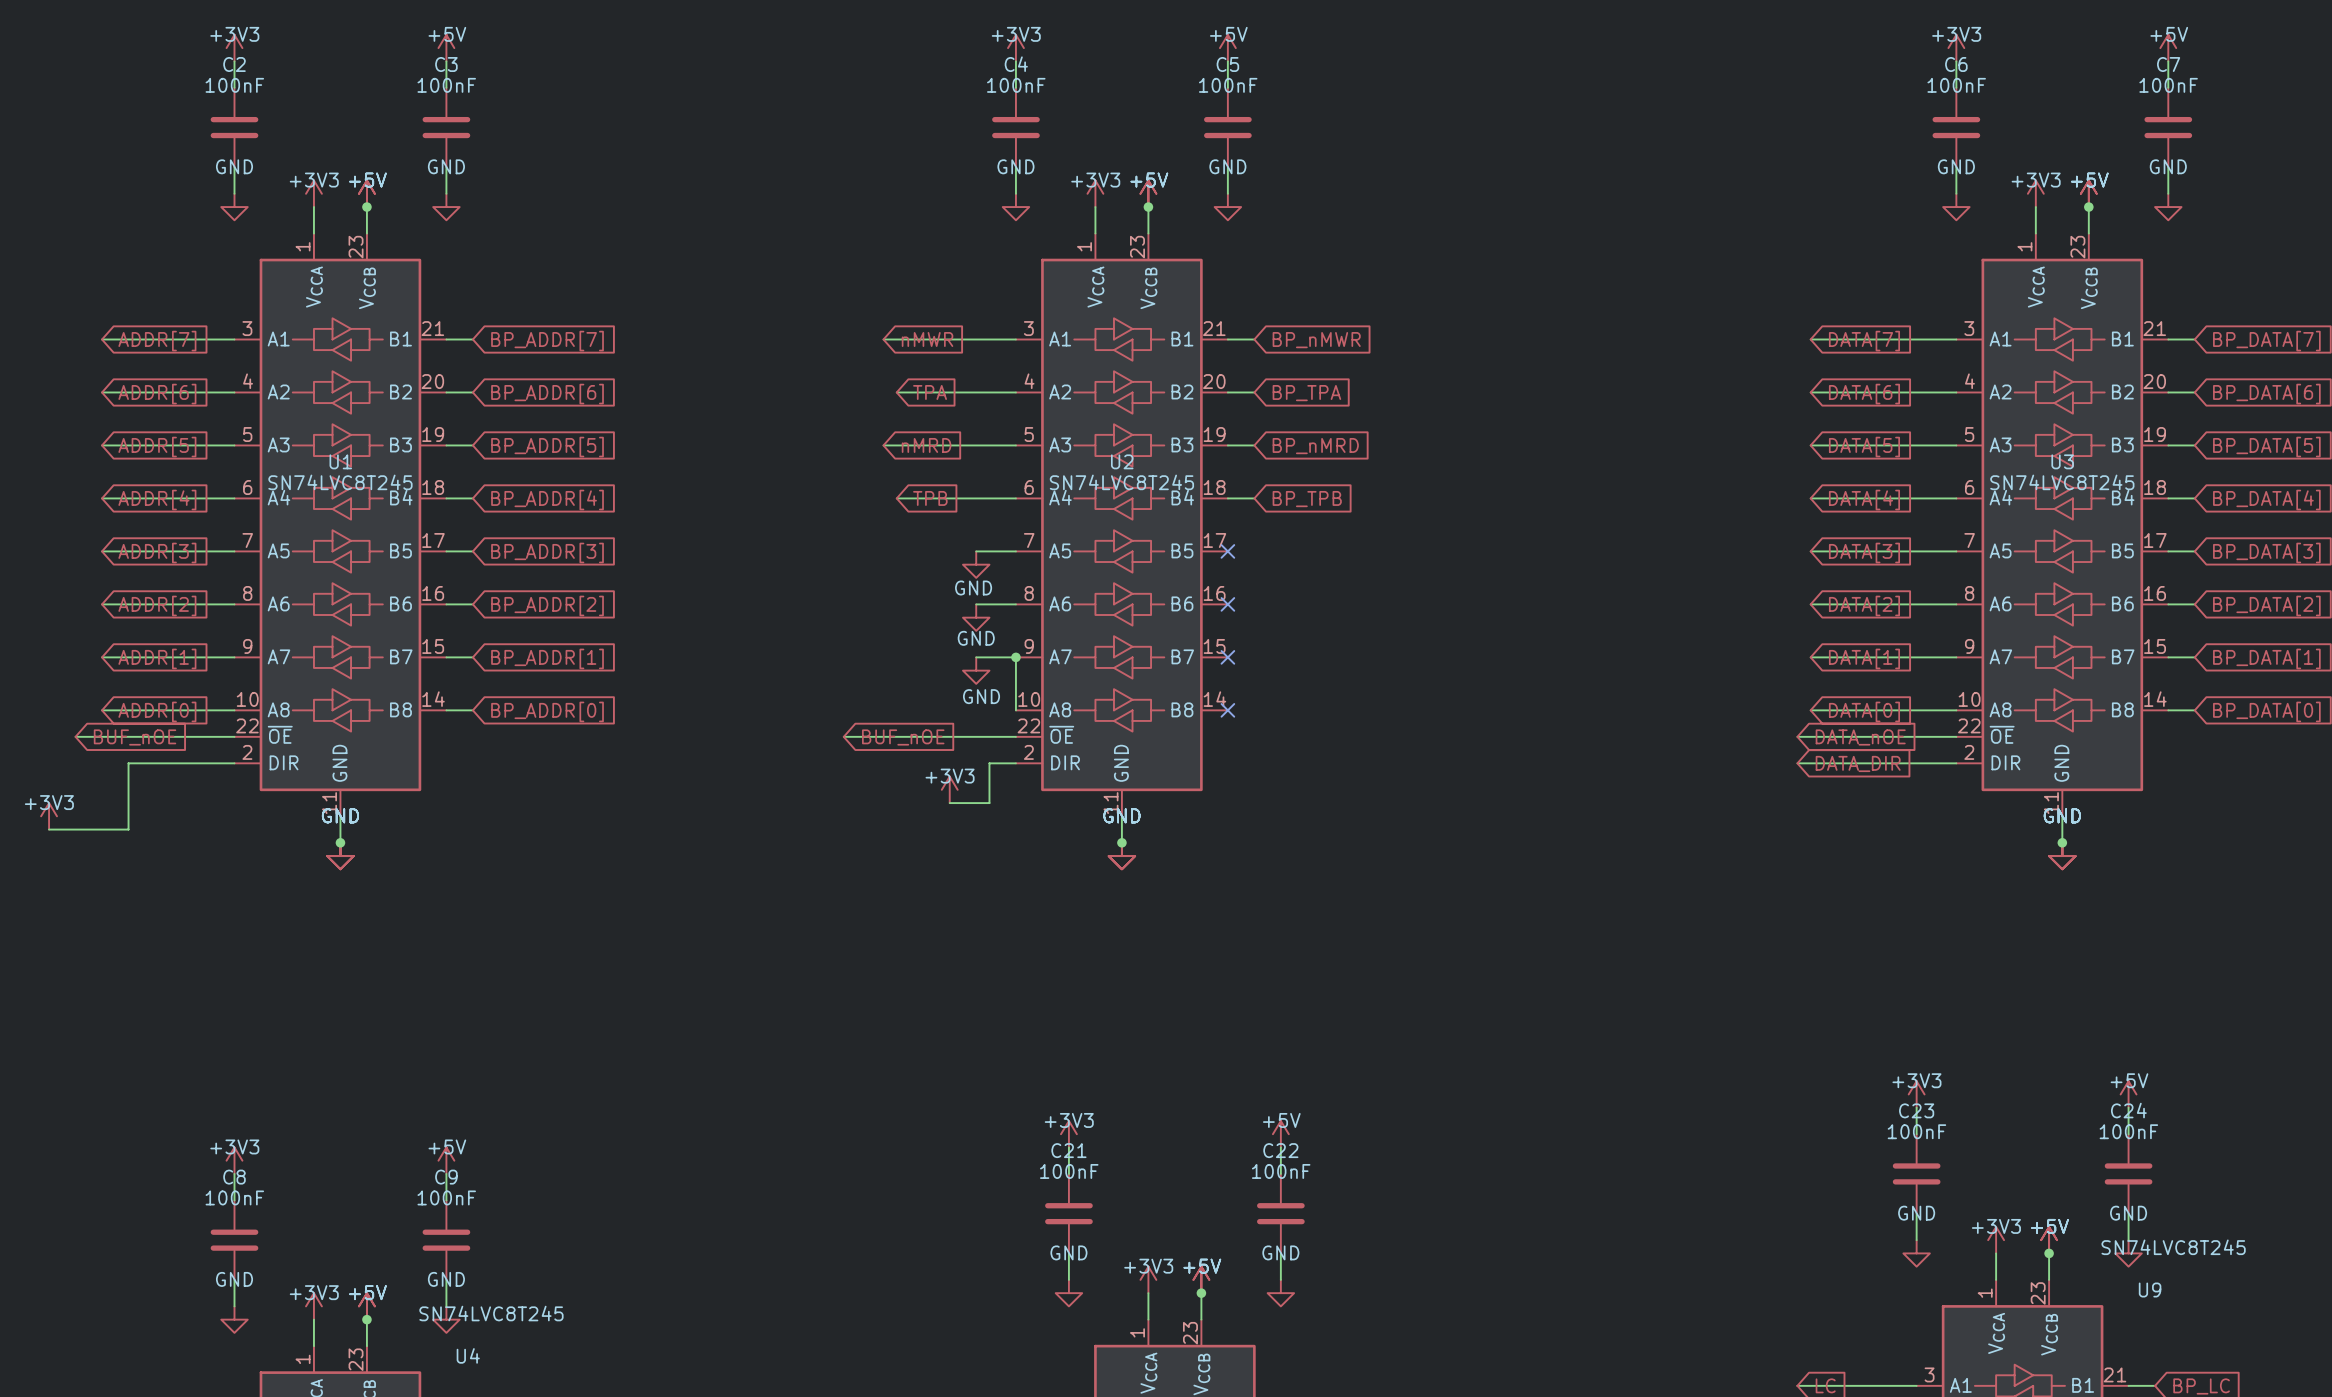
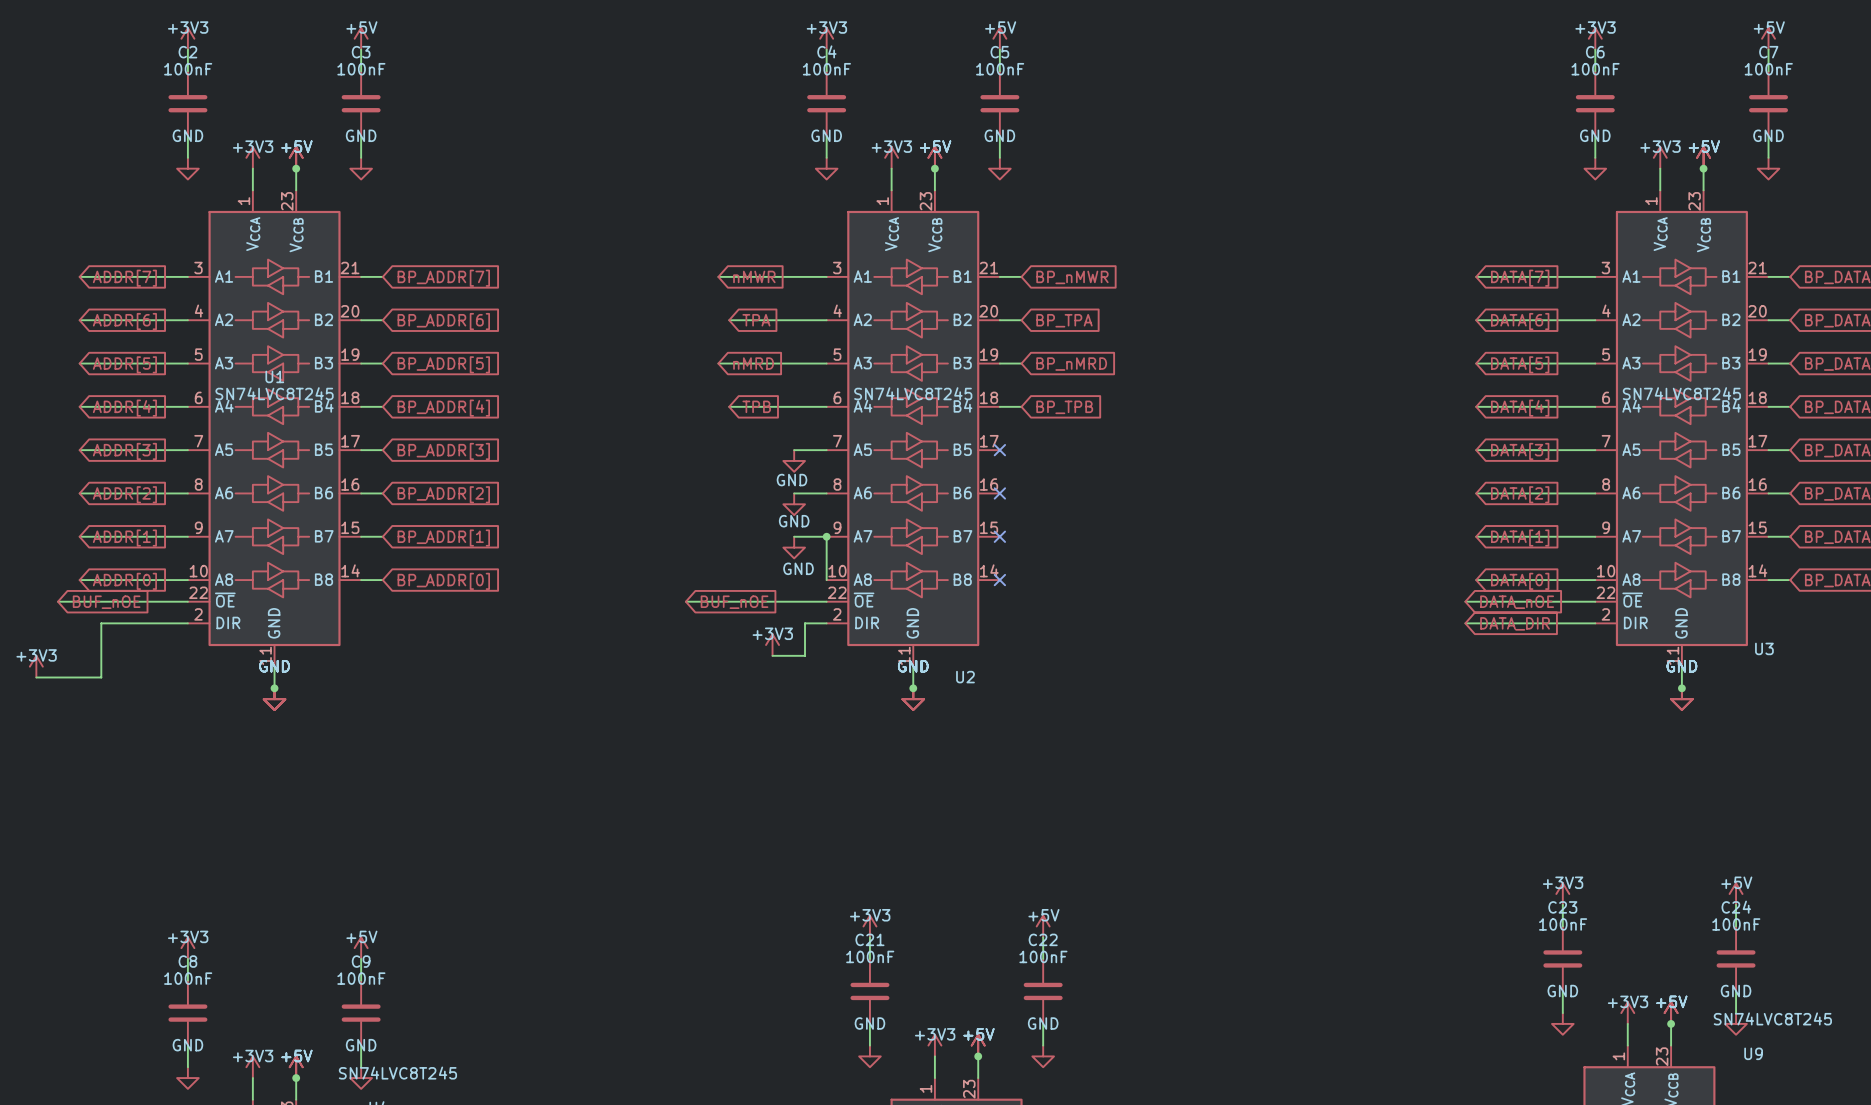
U2 name position: U2 (1122, 461) -> U2 (965, 677)
U3 name position: U3 (2062, 461) -> U3 (1764, 648)

